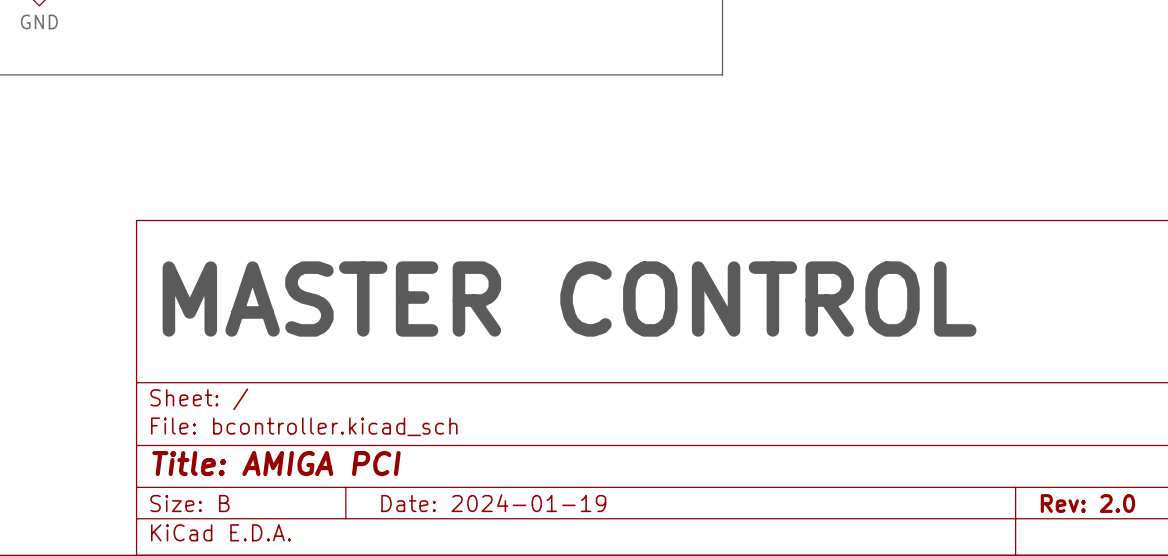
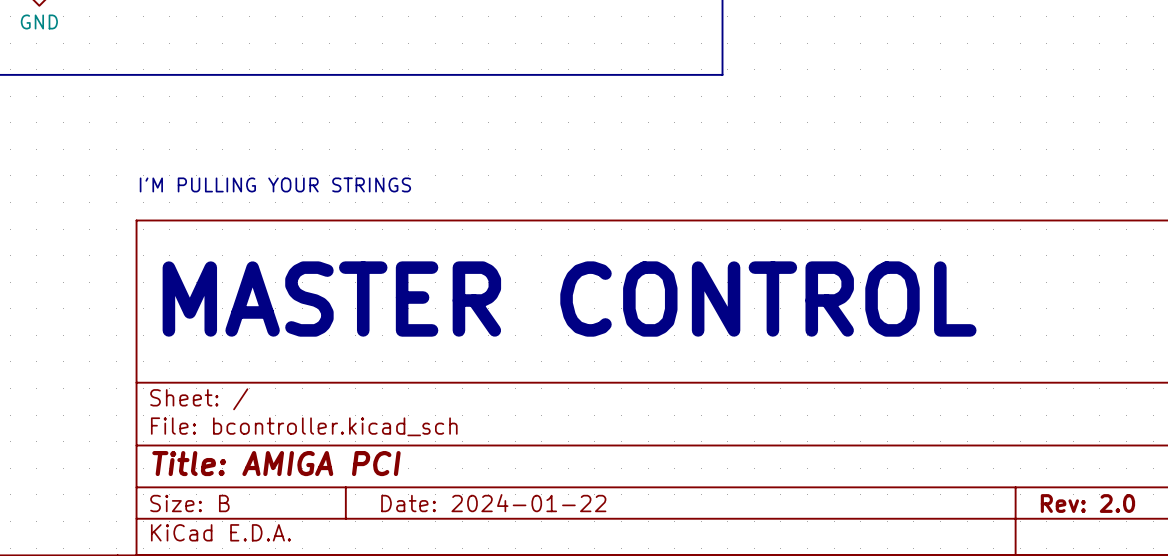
text: none -> I'M PULLING YOUR STRINGS (275, 184)
title block: Date: 2024-01-19 (493, 503) -> Date: 2024-01-22 (493, 503)

